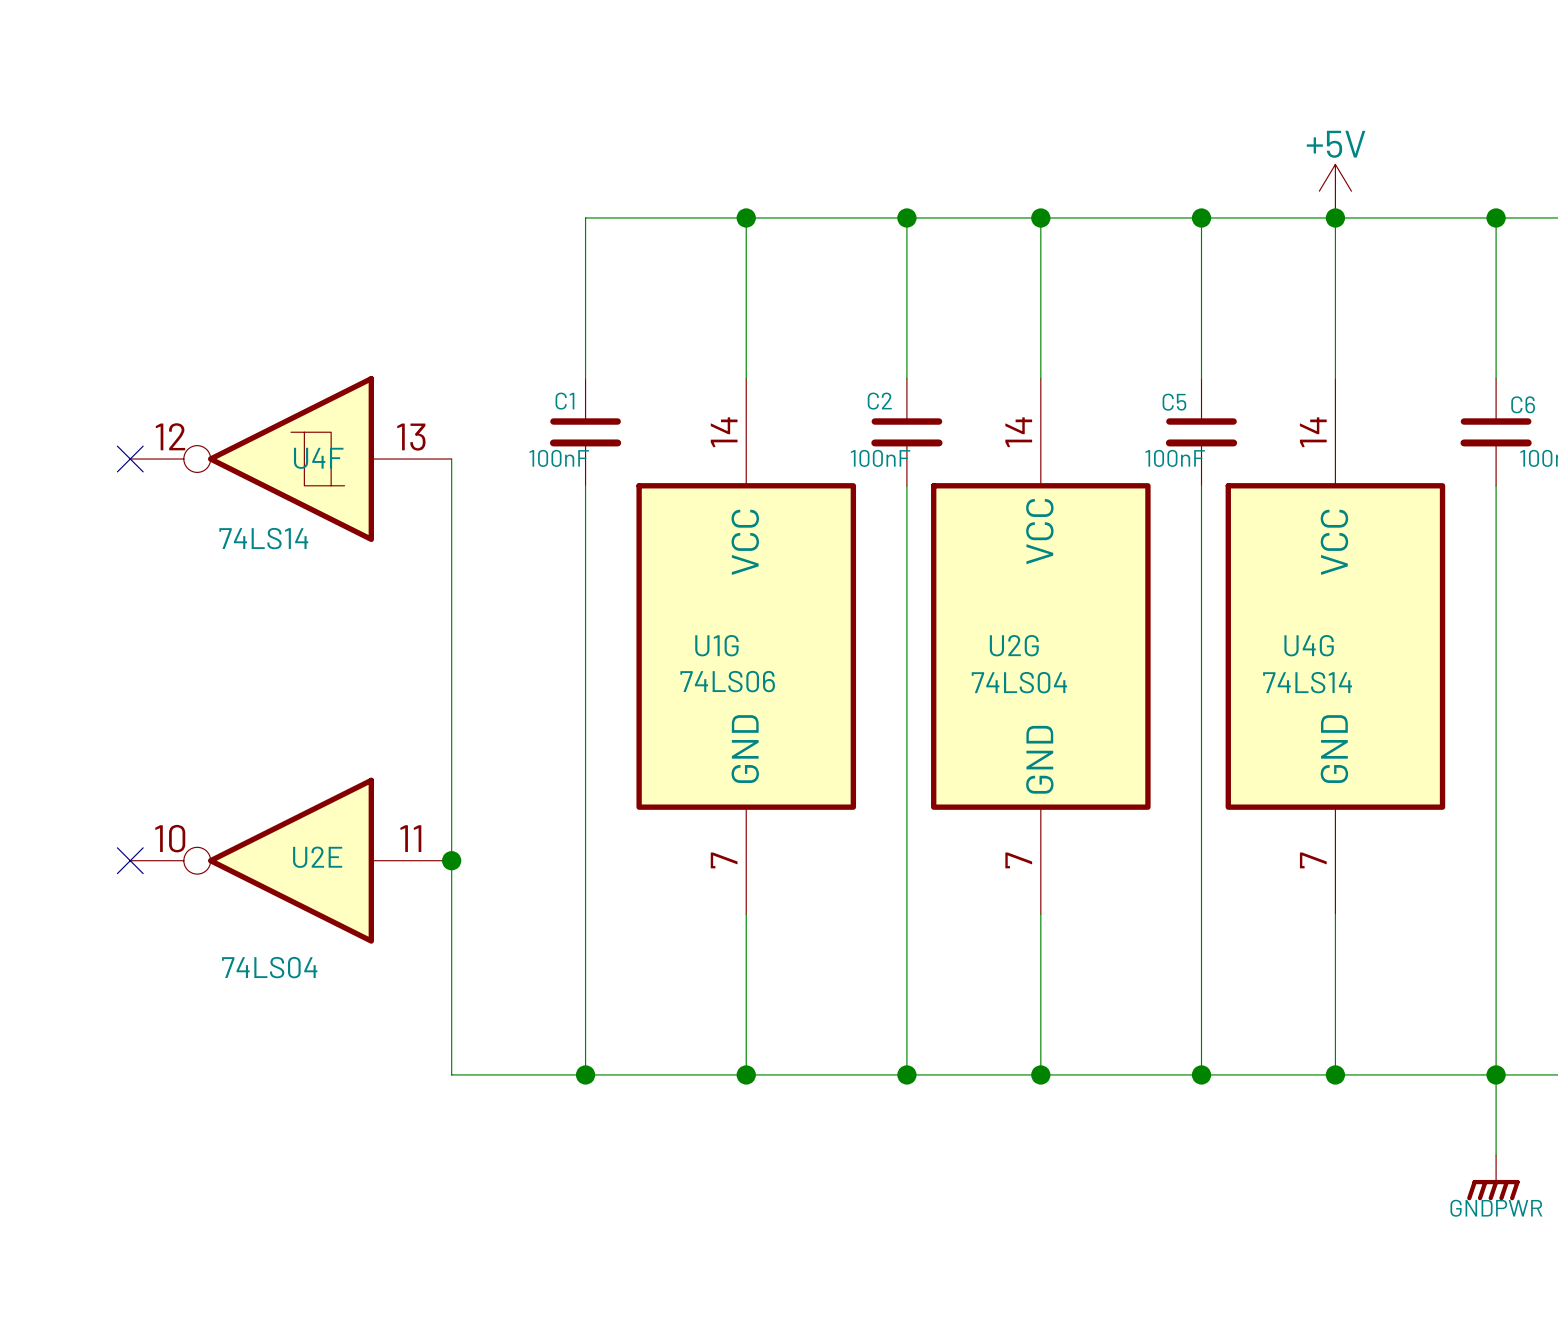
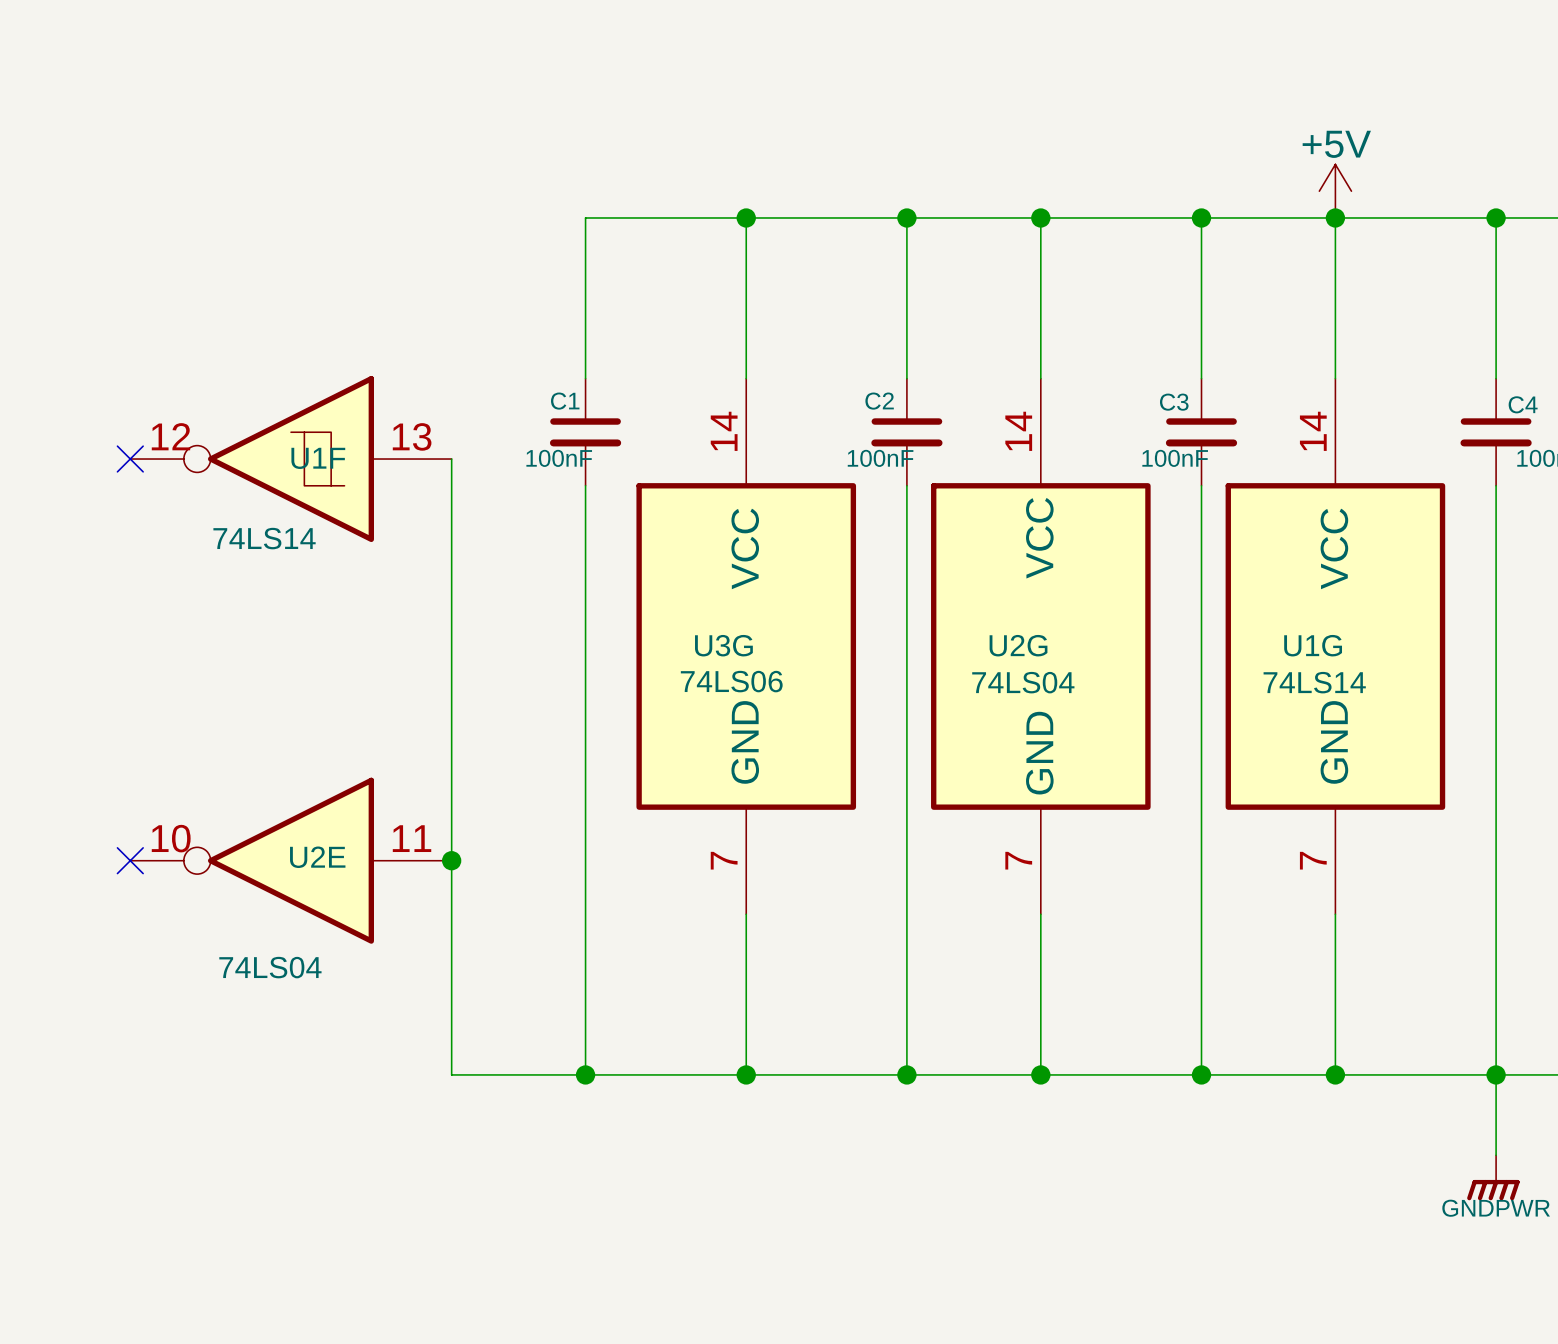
C5 name: C5 (1174, 402) -> C3 (1174, 402)
C6 name: C6 (1523, 404) -> C4 (1523, 404)
U4F name: U4F (318, 458) -> U1F (318, 458)
U1G name: U1G (716, 645) -> U3G (723, 645)
U4G name: U4G (1309, 645) -> U1G (1313, 645)

